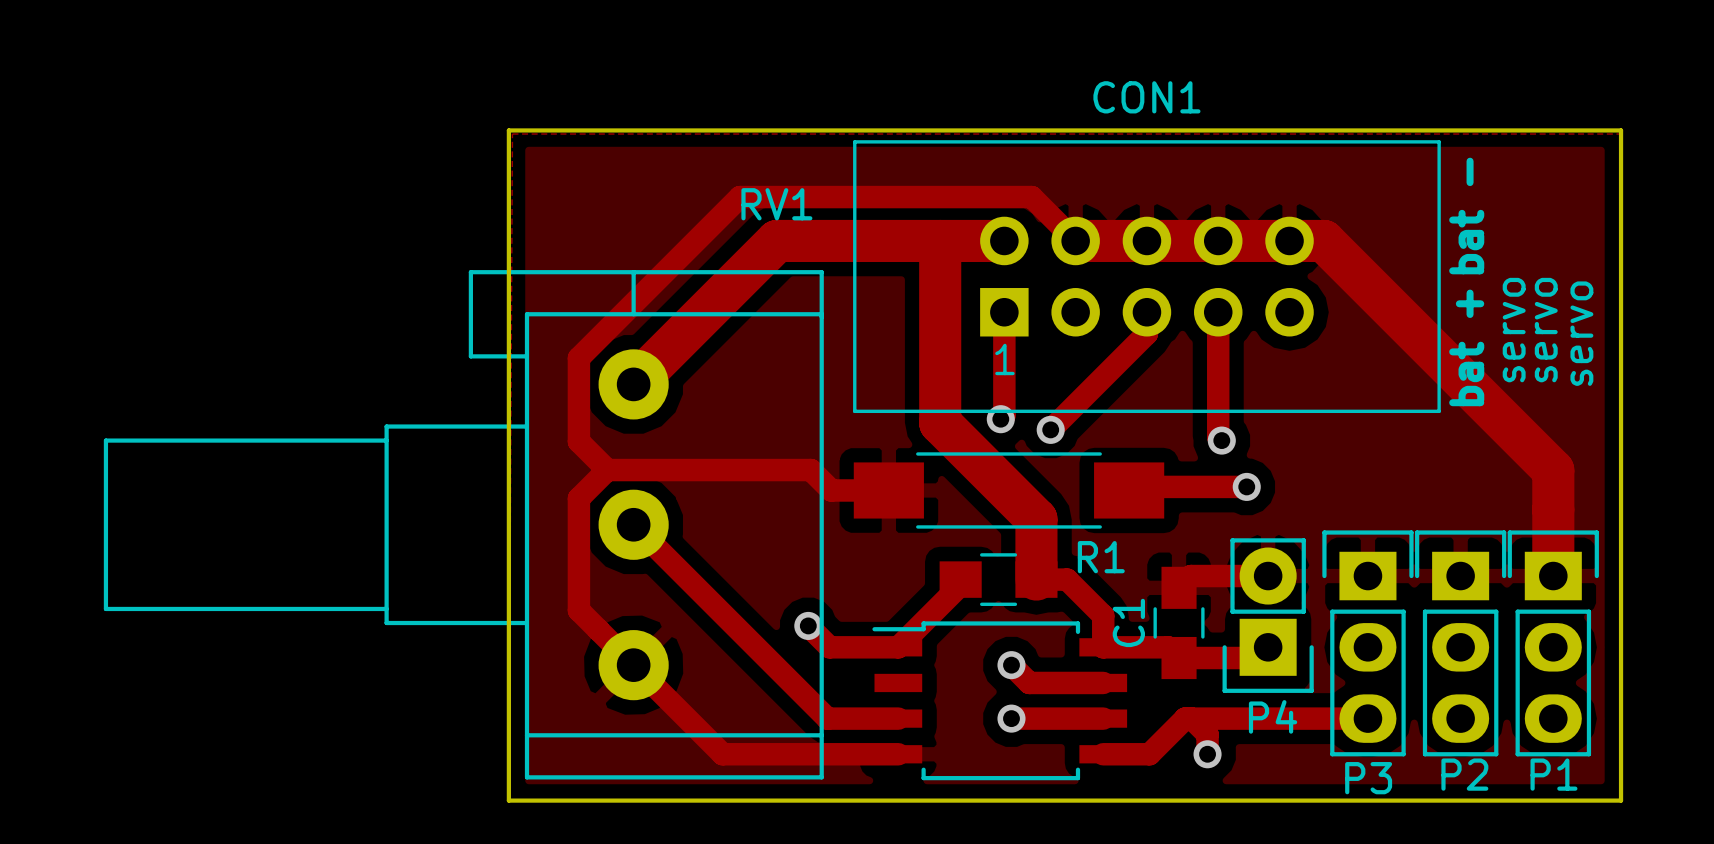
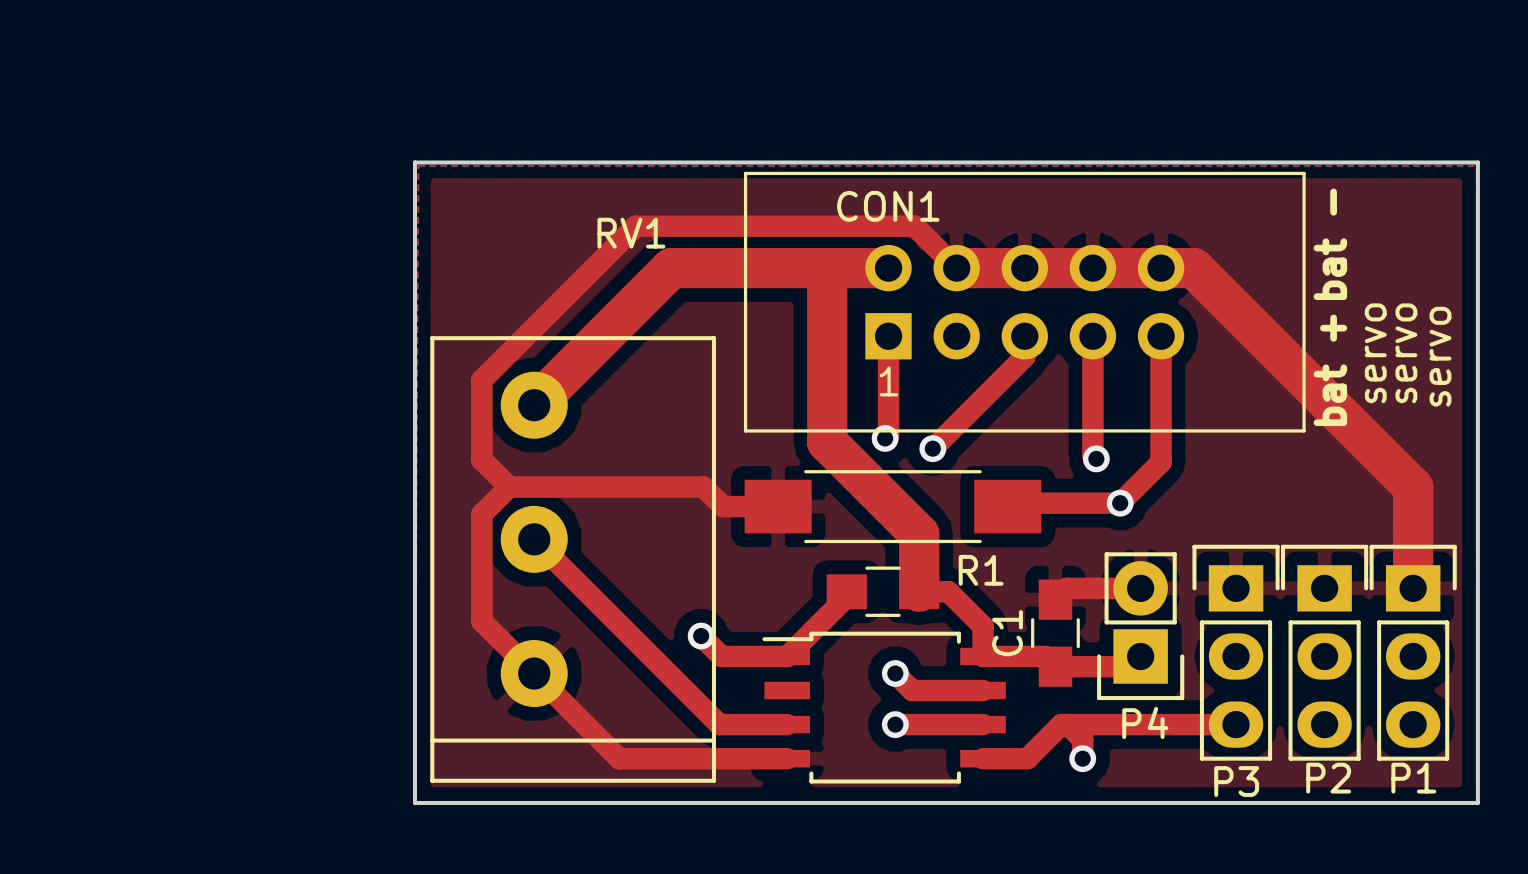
CON1 name position: CON1 (1146, 97) -> CON1 (888, 206)
RV1 name position: RV1 (776, 204) -> RV1 (631, 233)
RV1 footprint: [103, 270, 824, 780] -> [430, 336, 716, 783]
track: none -> (1161, 336) (1161, 462) (1120, 503)

